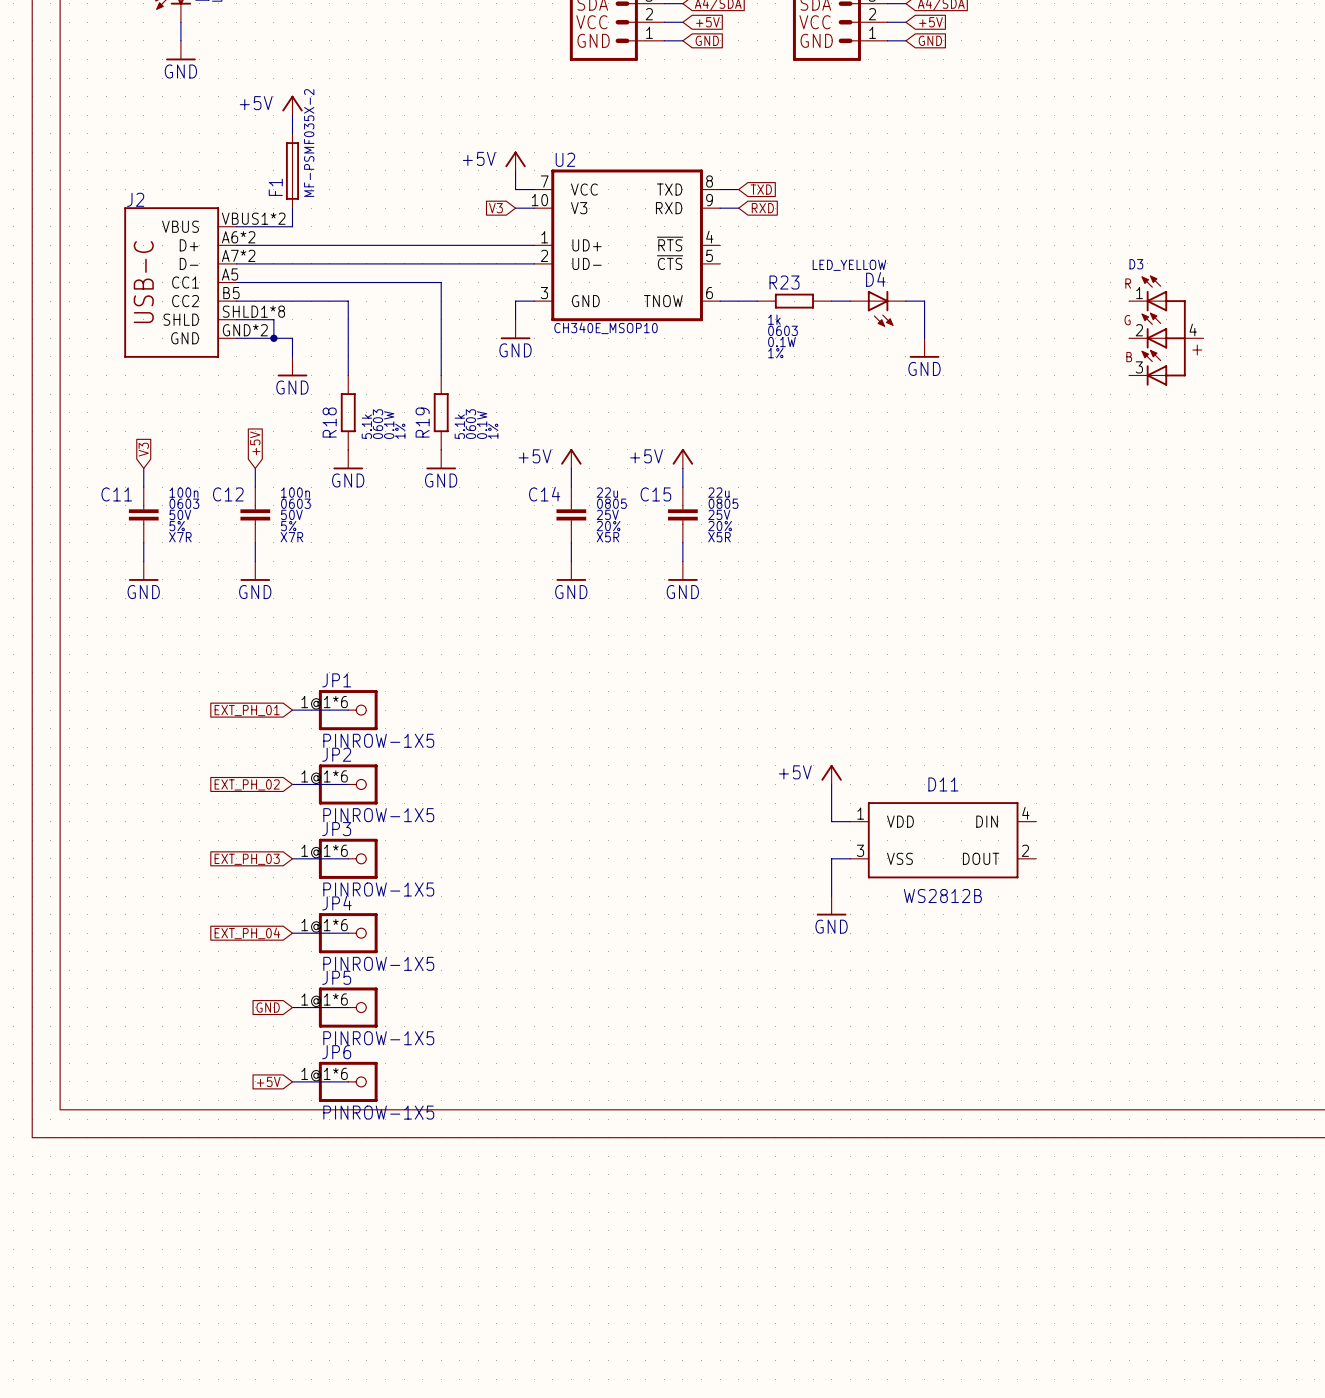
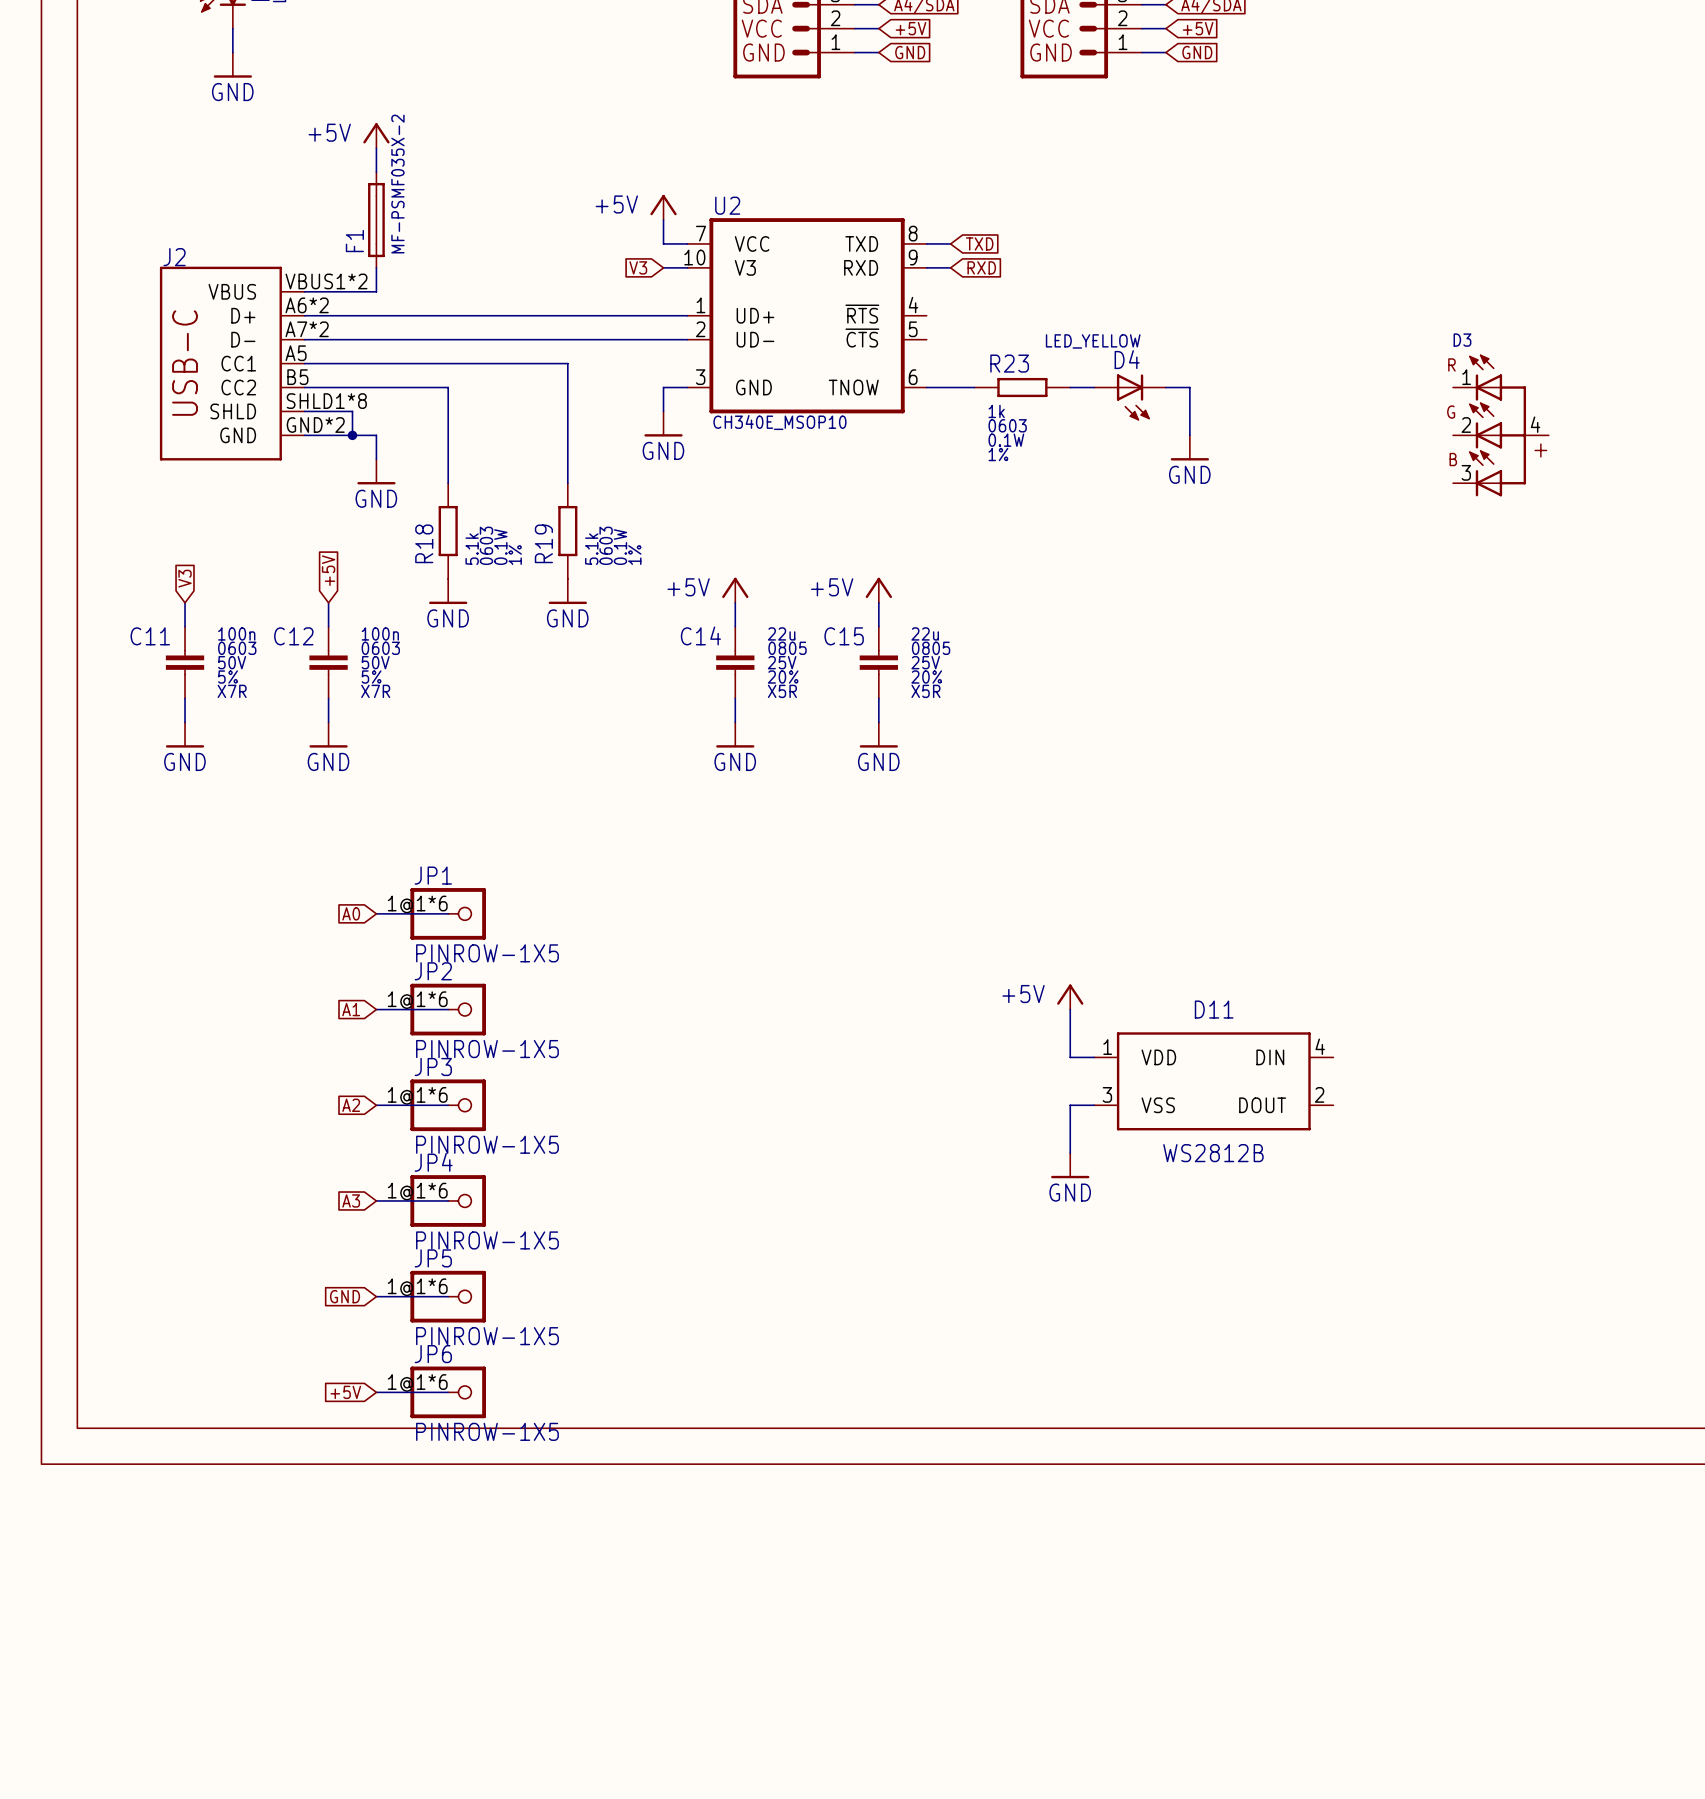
global label: EXT_PH_01 (247, 710) -> A0 (351, 913)
global label: EXT_PH_02 (247, 784) -> A1 (351, 1009)
global label: EXT_PH_03 (247, 859) -> A2 (351, 1105)
global label: EXT_PH_04 (247, 933) -> A3 (351, 1200)

